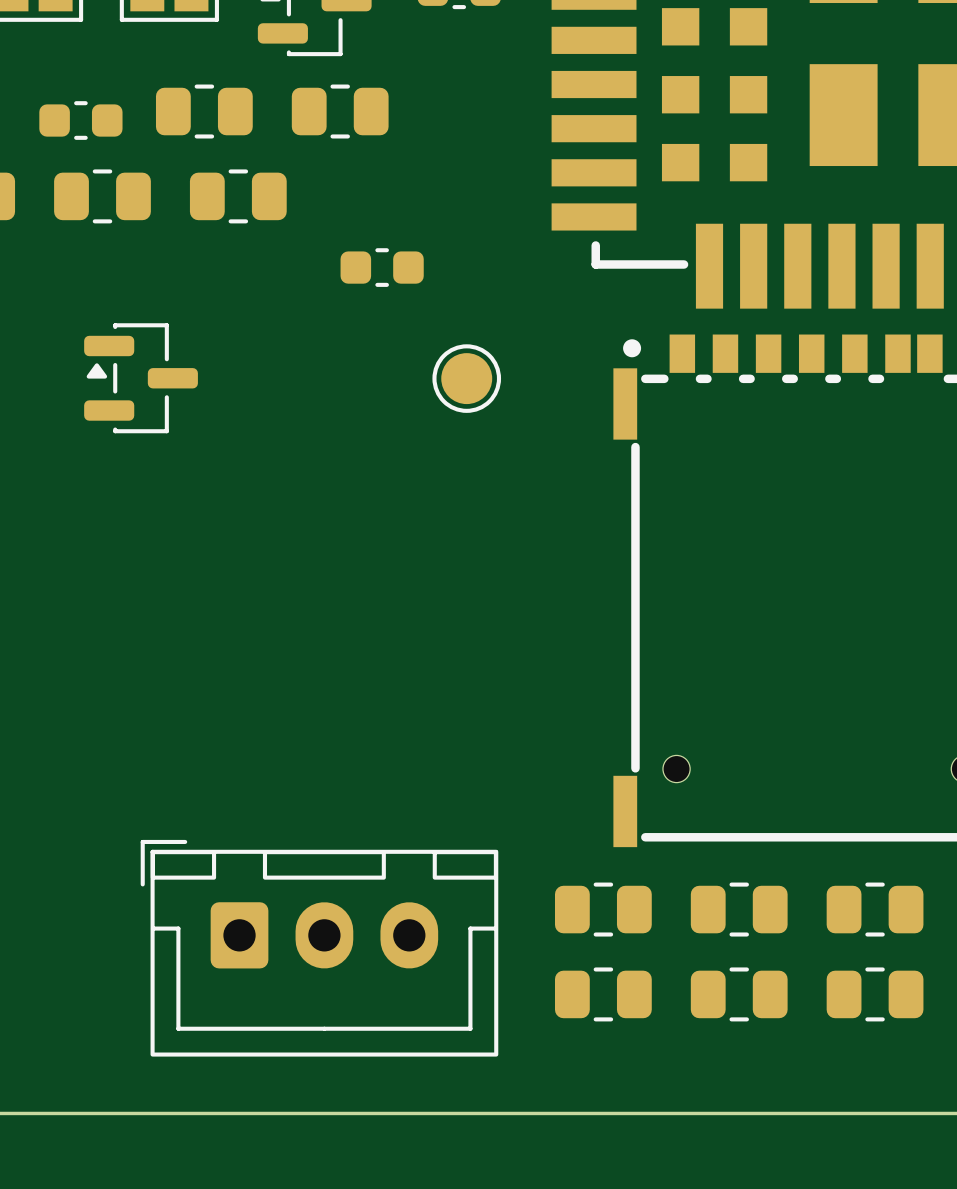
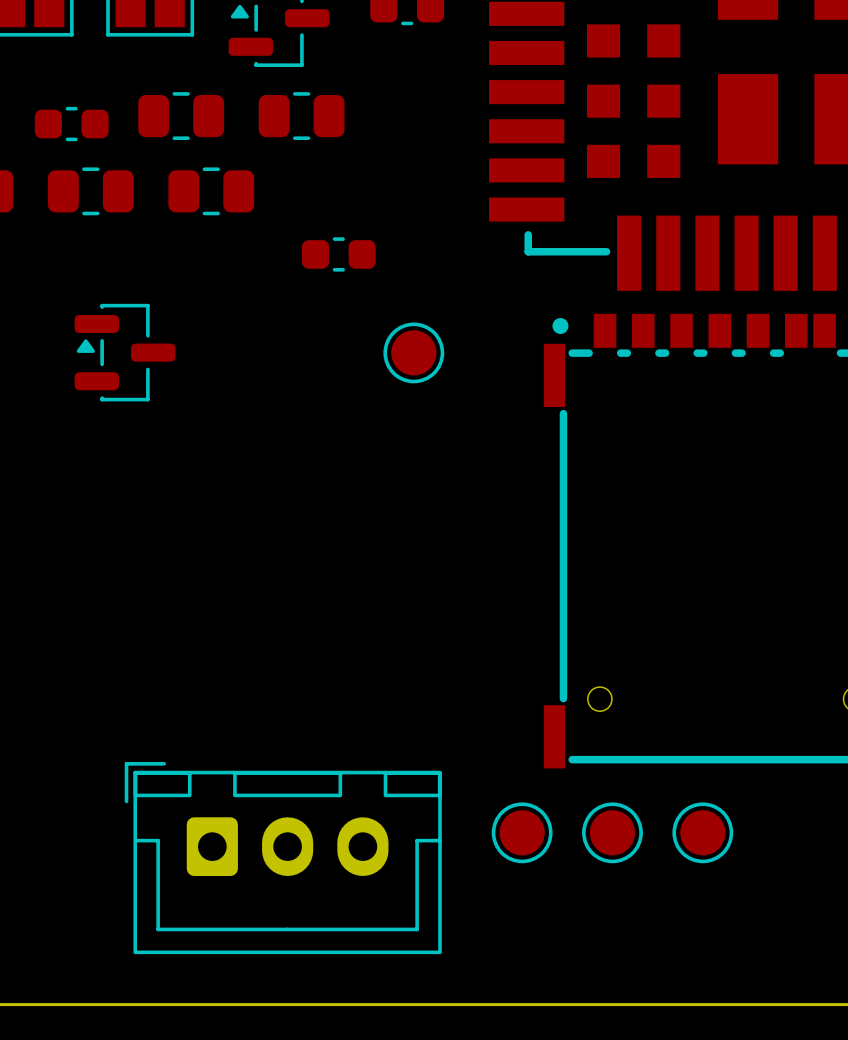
part footprint: [554, 882, 652, 937] -> [491, 802, 553, 864]
part: (739, 909) -> none
part: (875, 909) -> none
part: none -> (612, 832)
part: none -> (702, 832)
part: (603, 994) -> none
part: (739, 994) -> none
part: (875, 994) -> none

